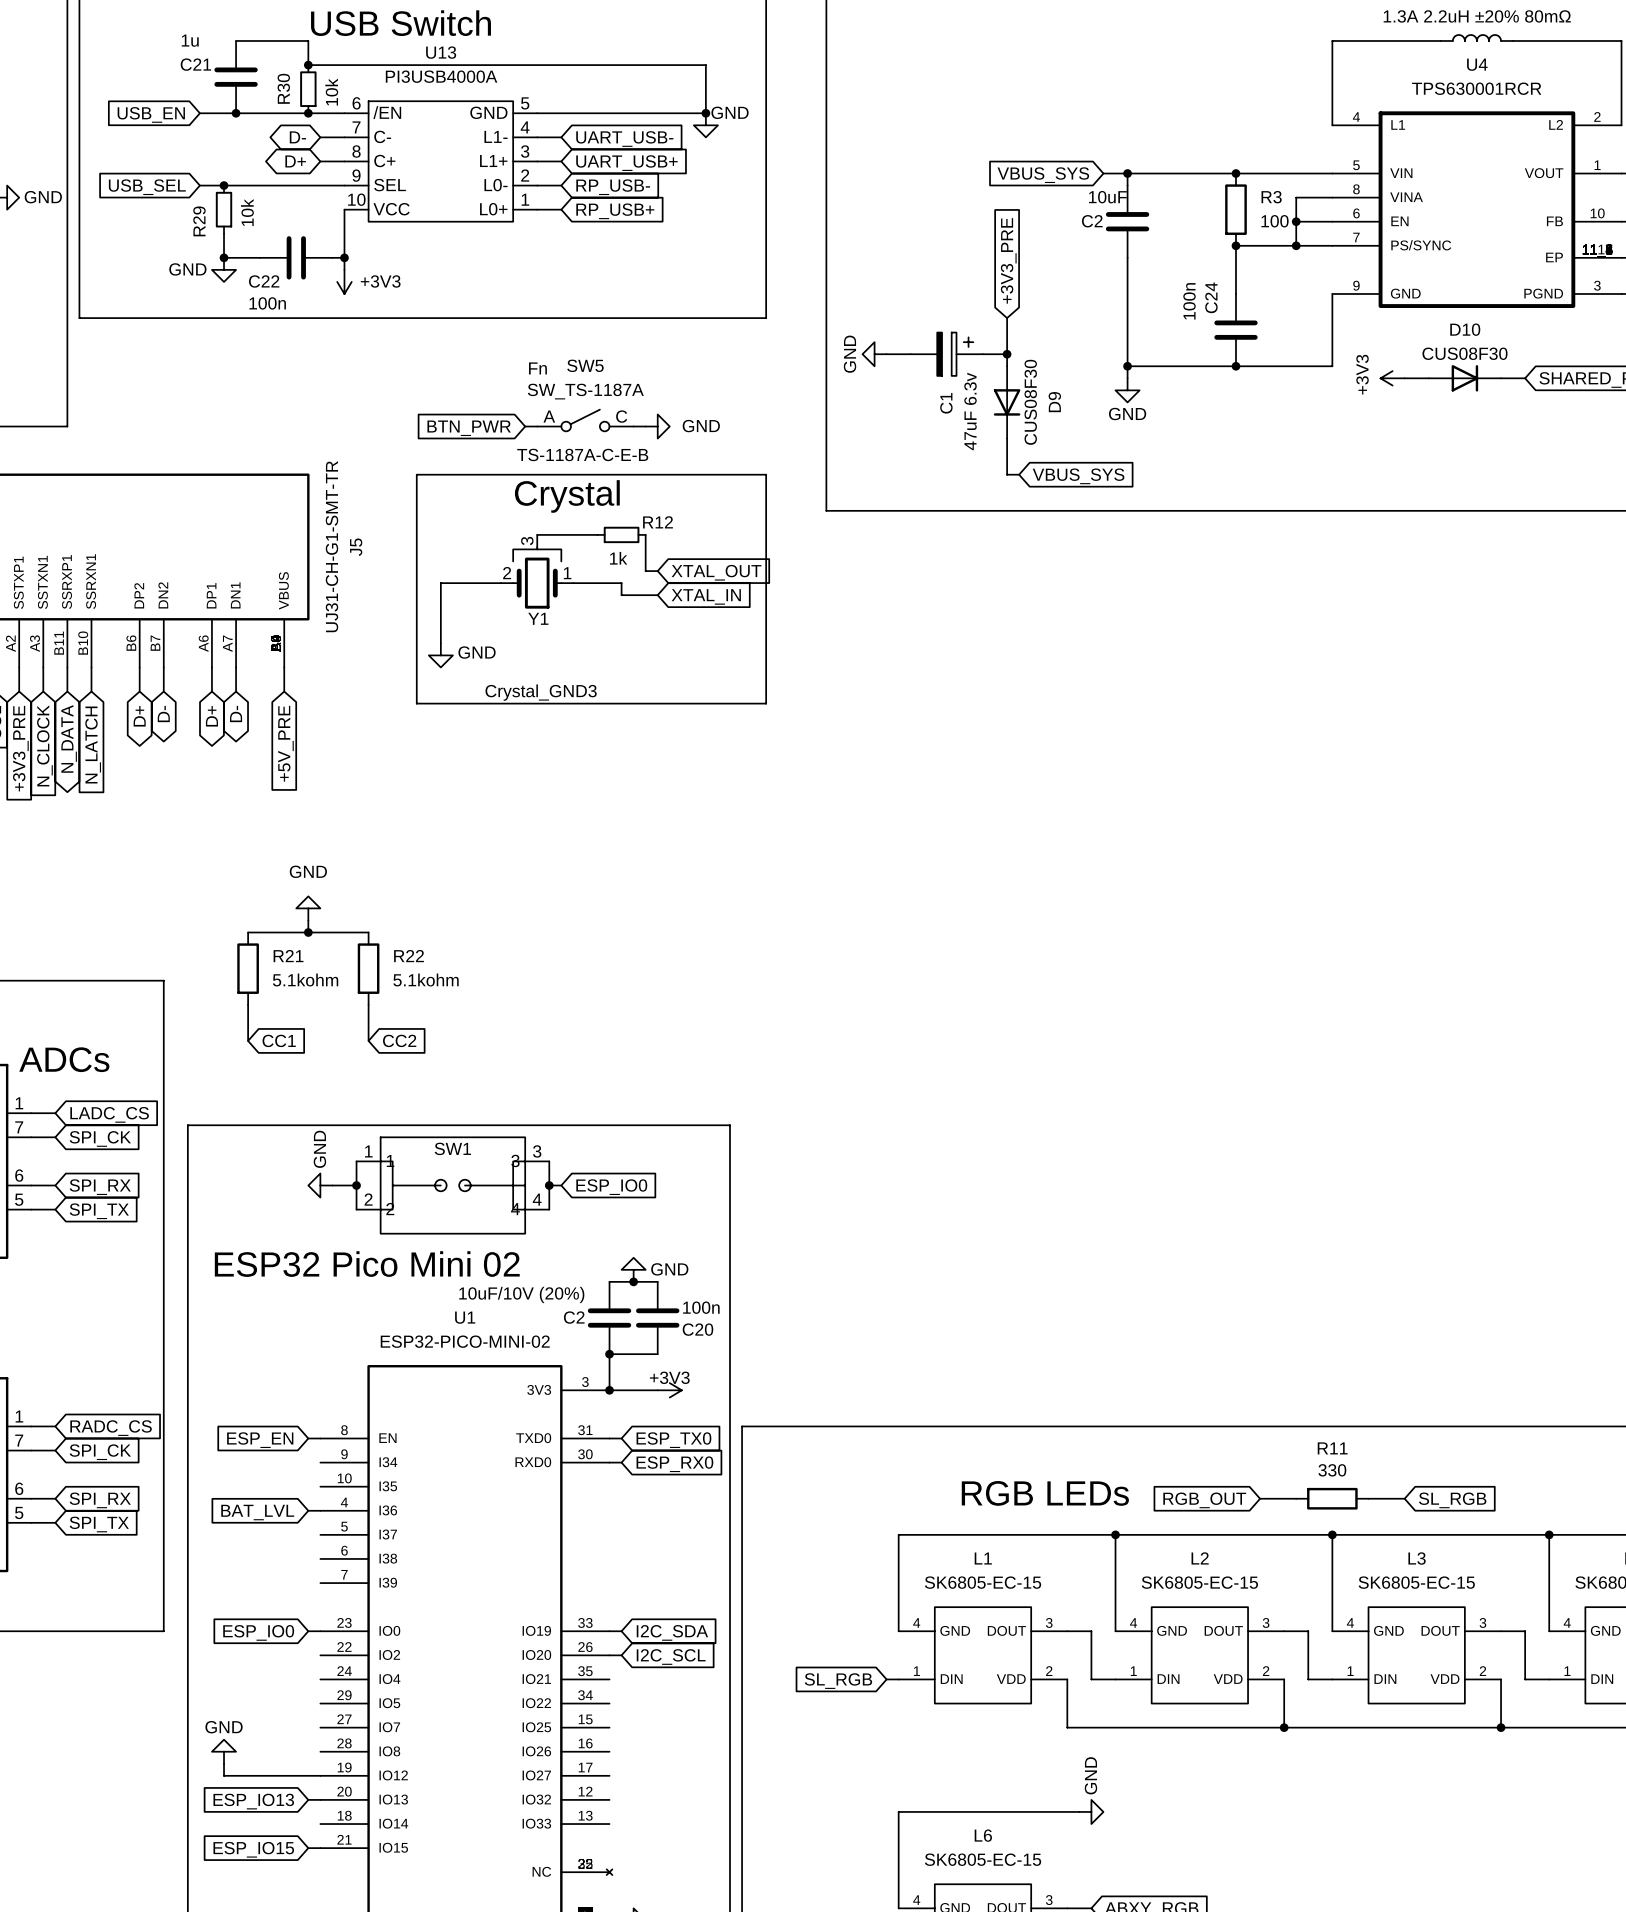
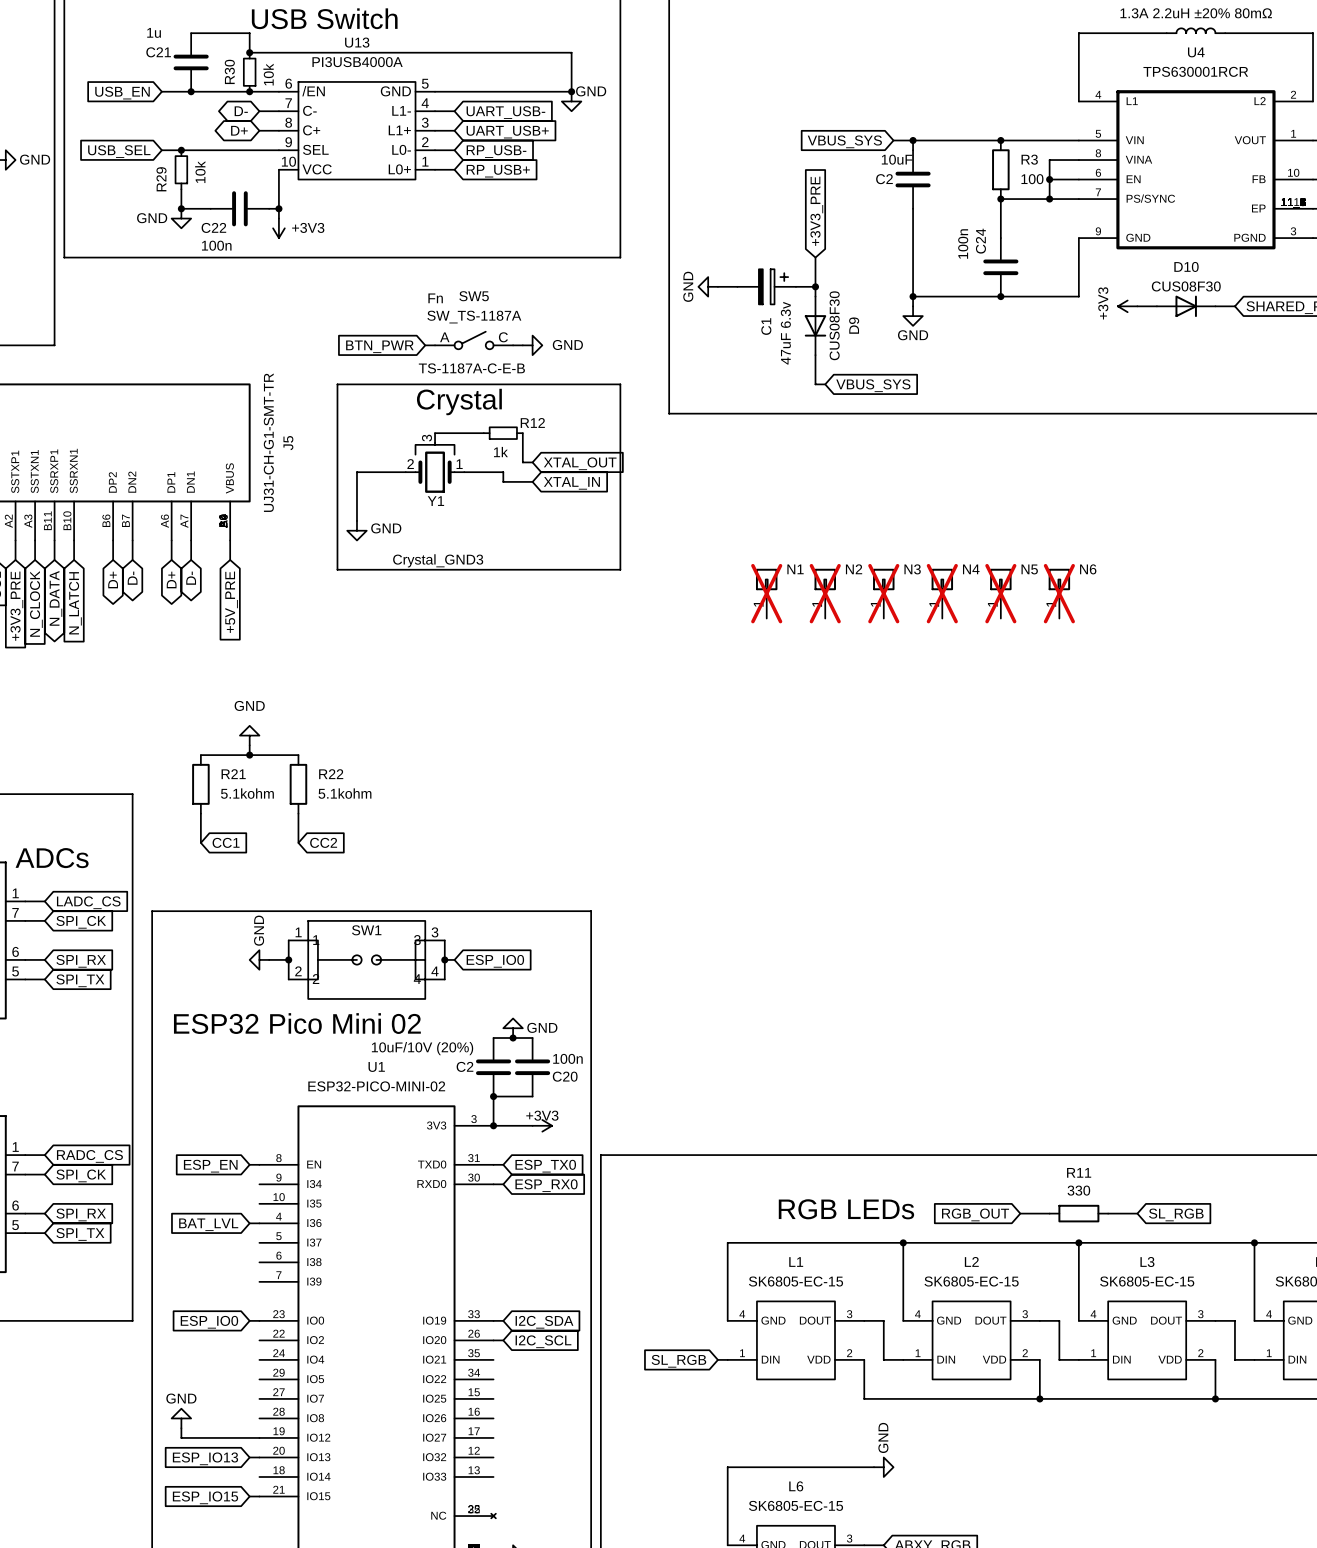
N1: none -> (766, 593)
N2: none -> (825, 593)
N3: none -> (883, 593)
N4: none -> (942, 593)
N5: none -> (1000, 593)
N6: none -> (1059, 593)

